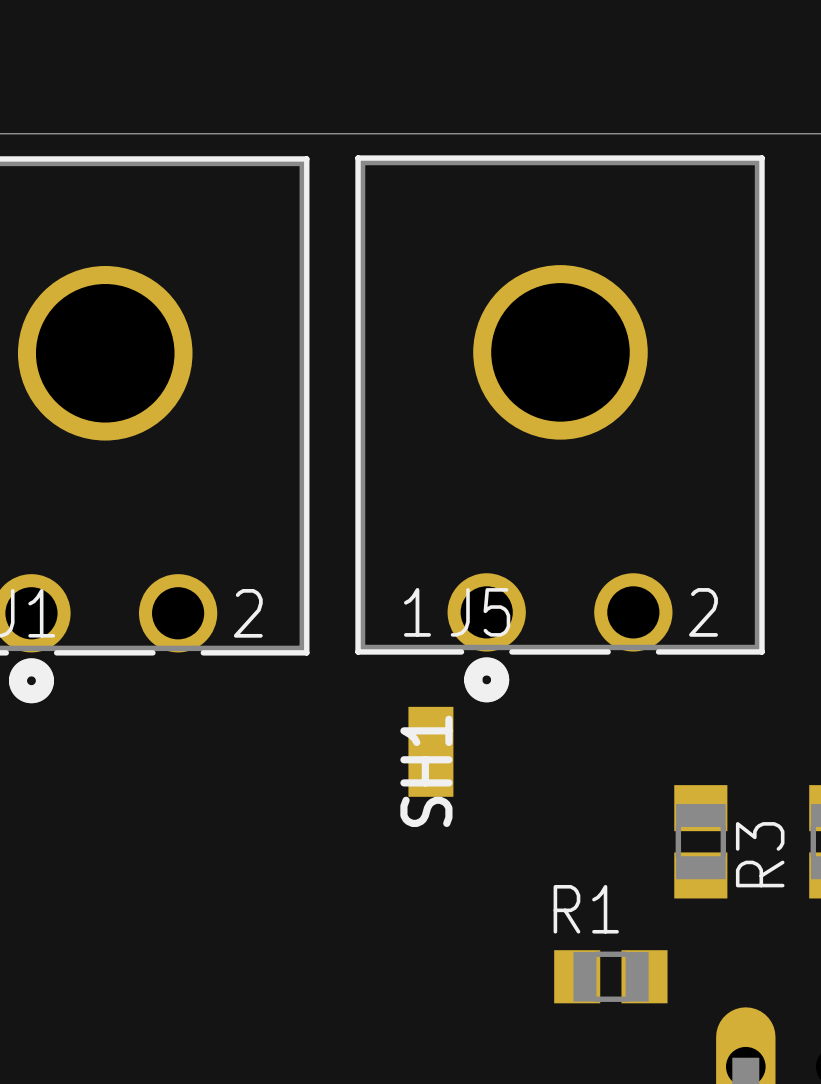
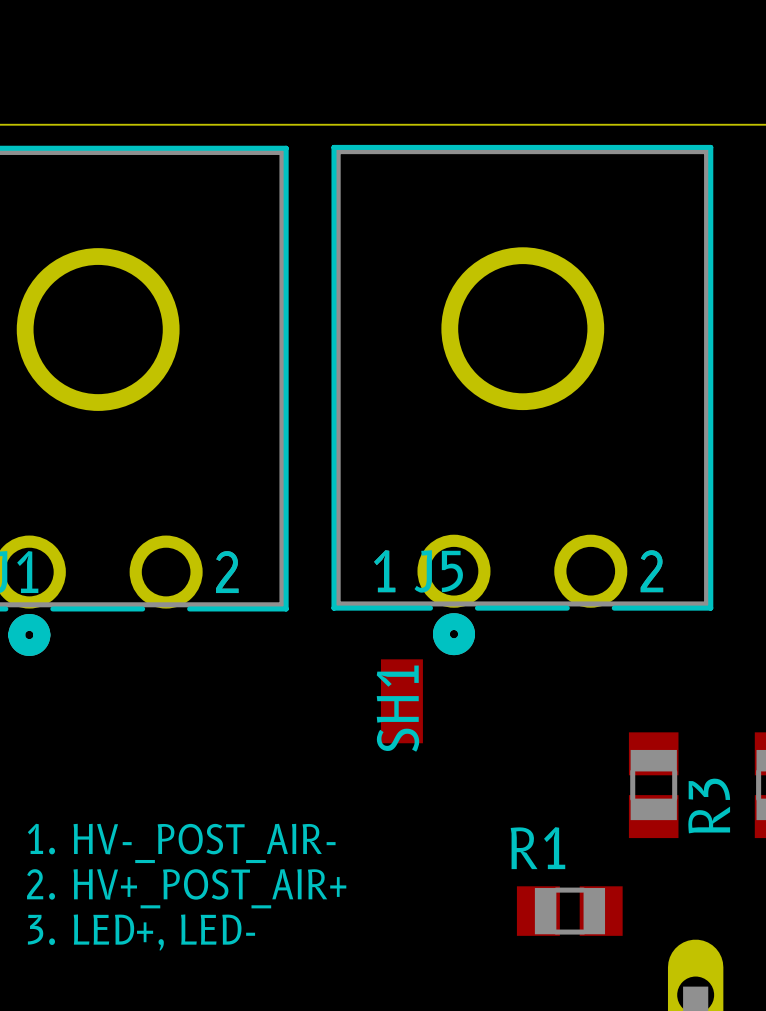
text: none -> 1. HV-_POST_AIR- (181, 843)
text: none -> 2. HV+_POST_AIR+ (186, 888)
text: none -> 3. LED+, LED- (141, 932)

